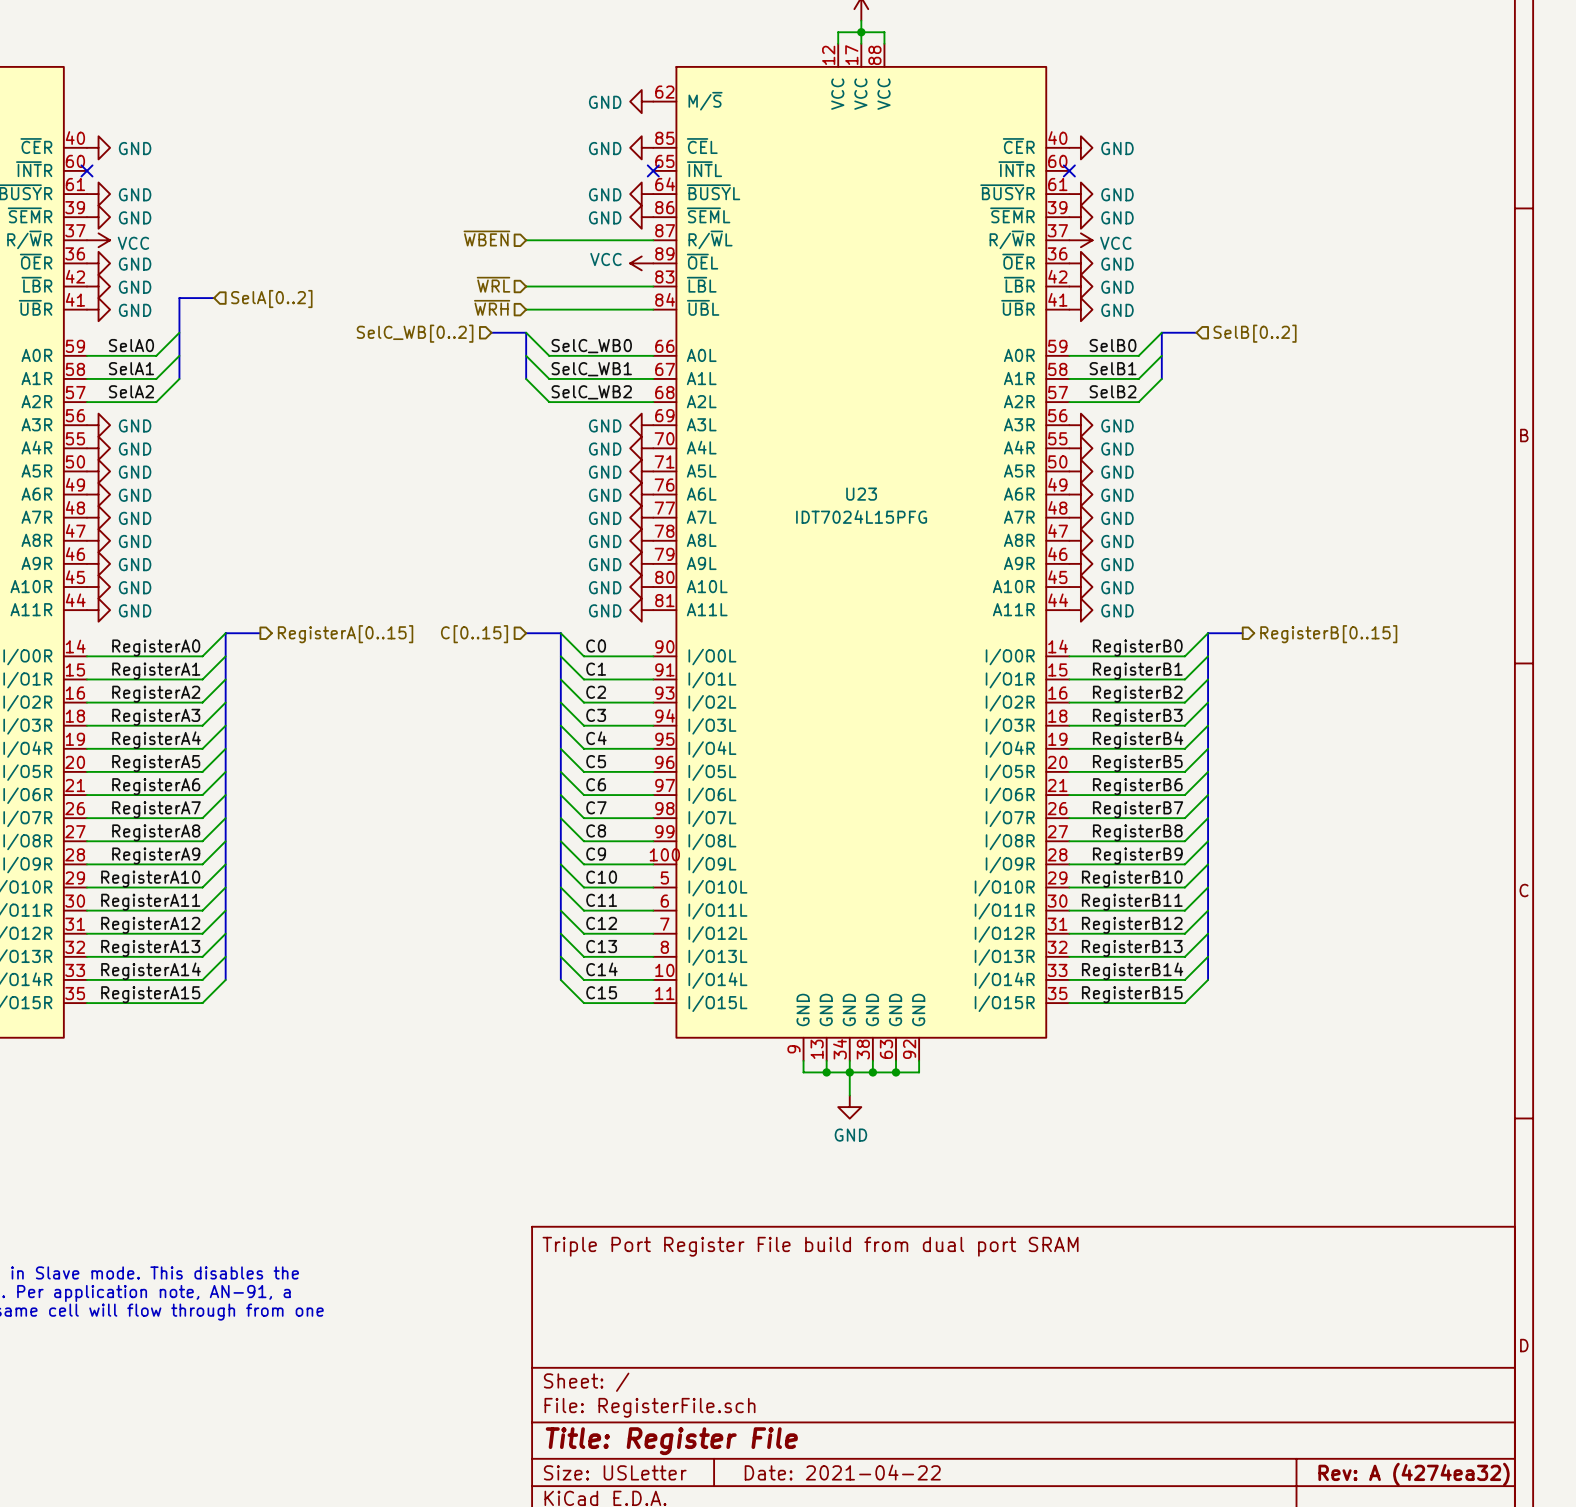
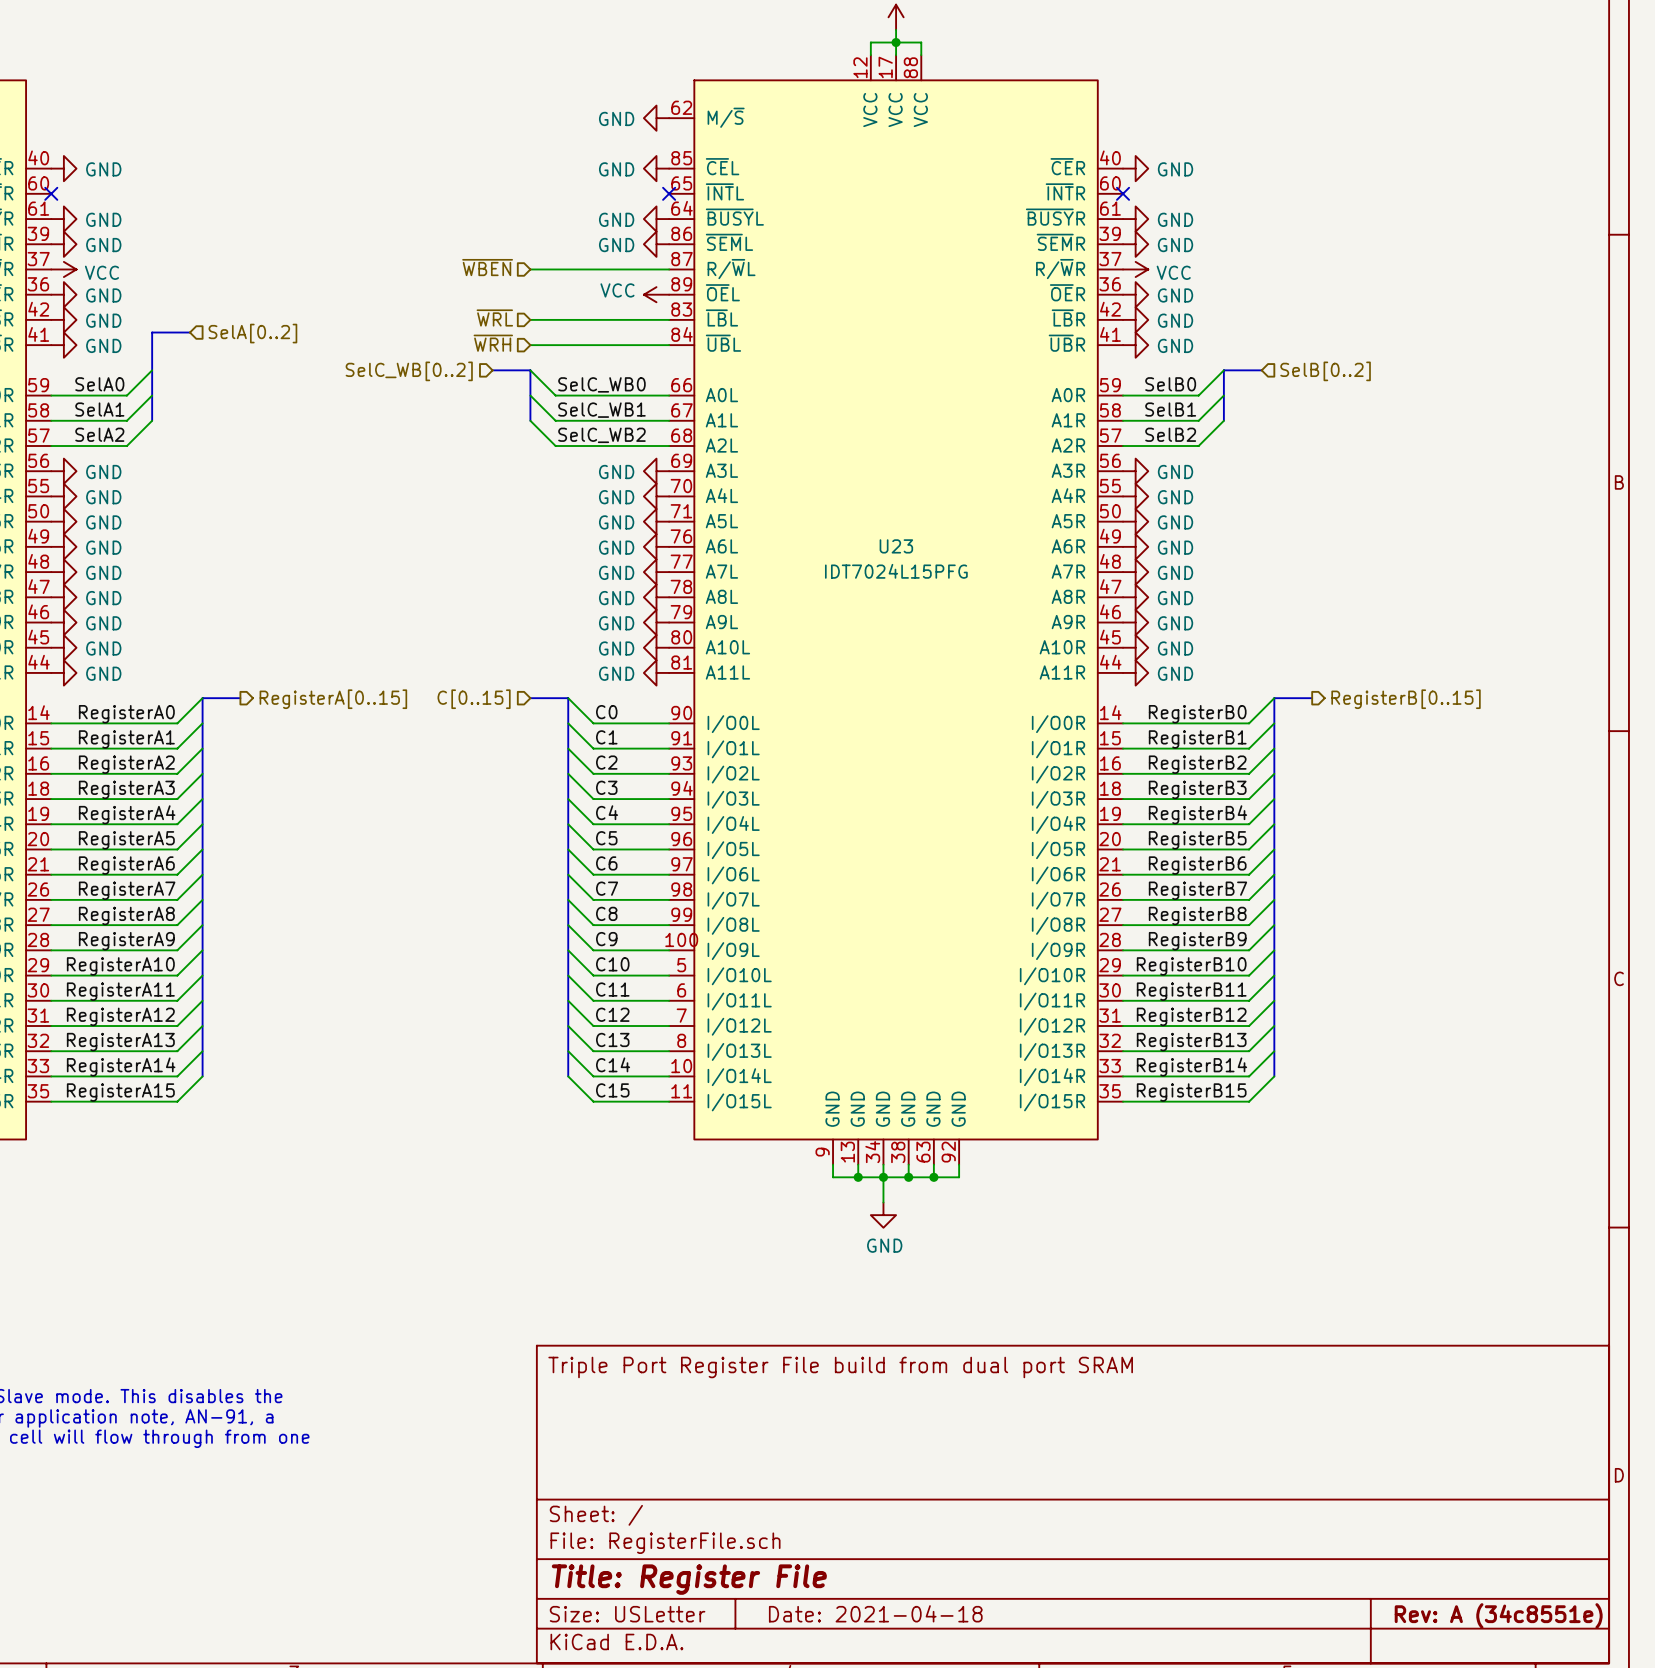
title block: Date: 2021-04-22 (842, 1472) -> Date: 2021-04-18 (875, 1613)
title block: Rev: A (4274ea32) (1414, 1474) -> Rev: A (34c8551e) (1498, 1615)

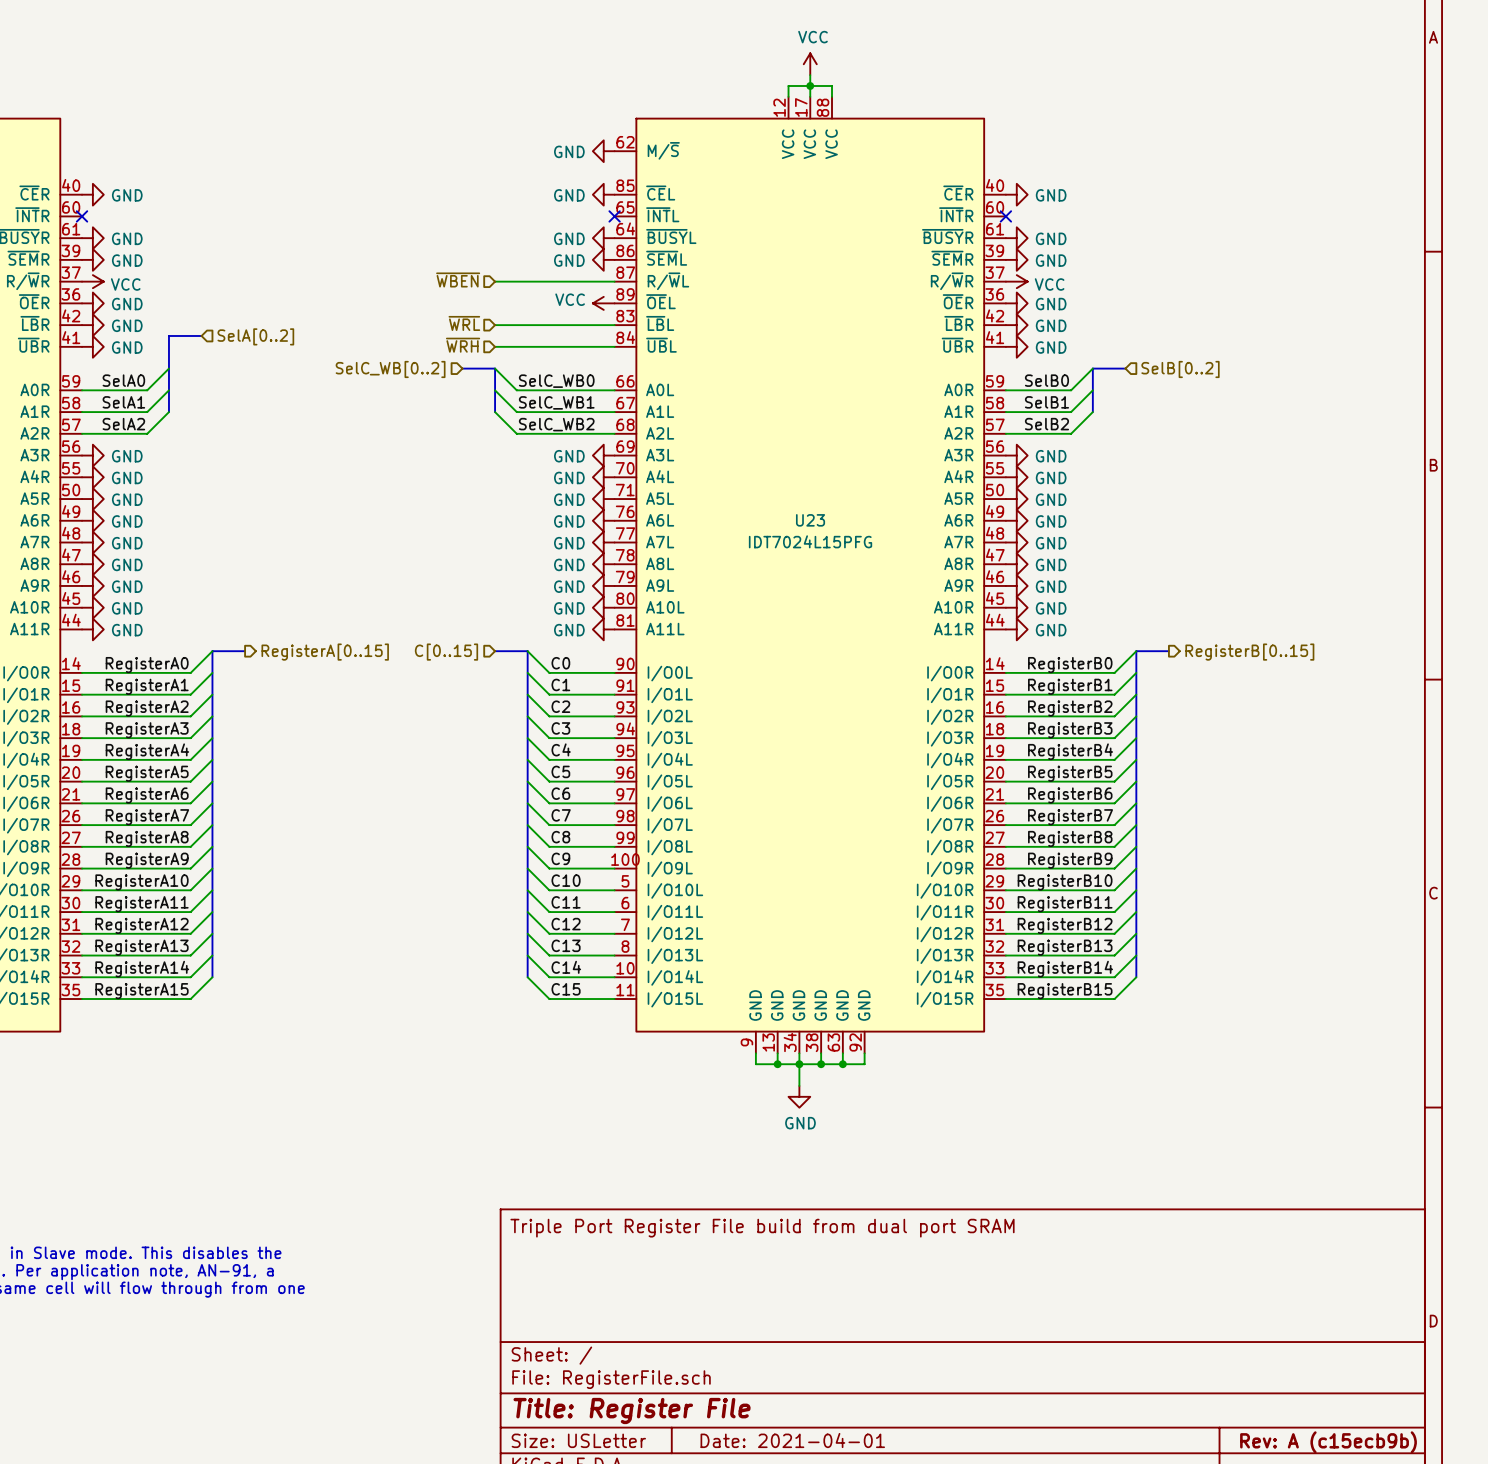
title block: Date: 2021-04-18 (875, 1613) -> Date: 2021-04-01 (792, 1440)
title block: Rev: A (34c8551e) (1498, 1615) -> Rev: A (c15ecb9b) (1328, 1442)

